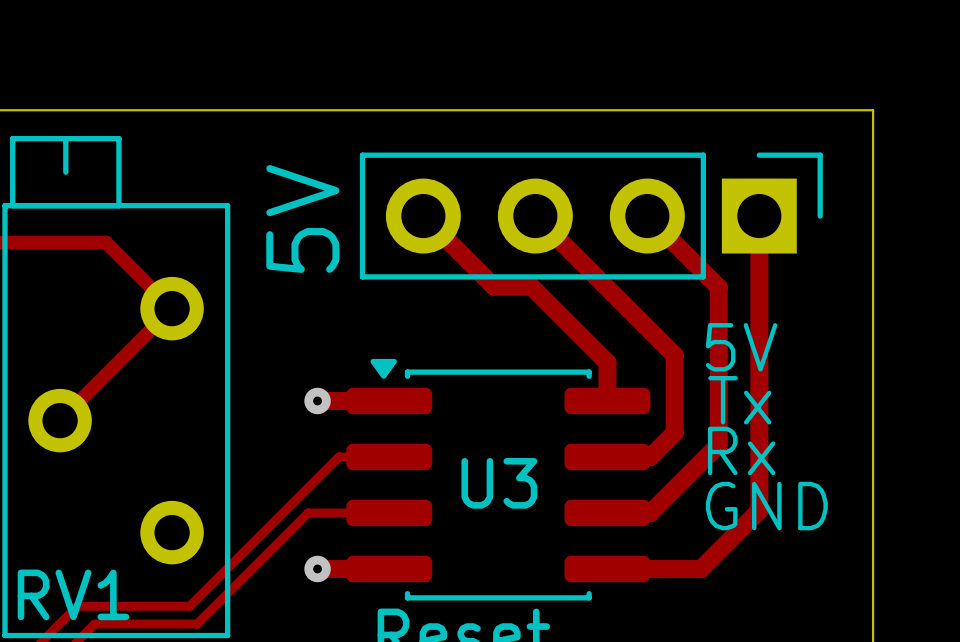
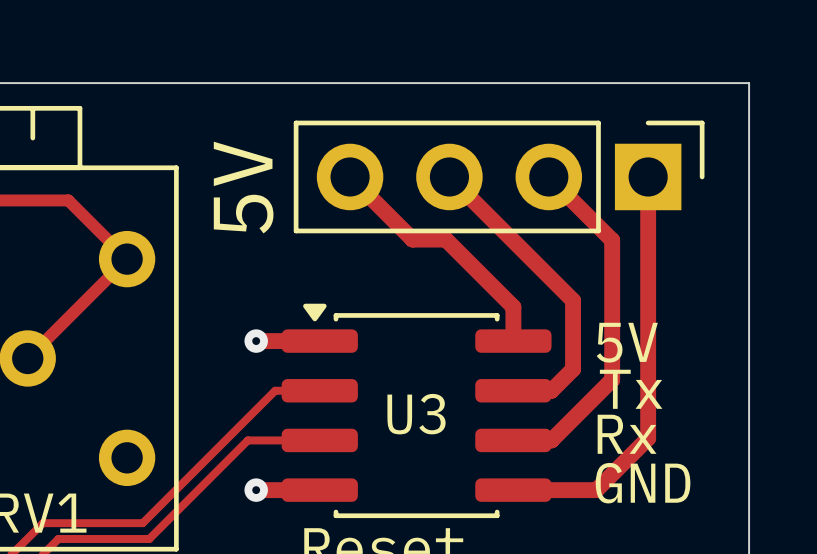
text position: 5V (741, 347) -> 5V (627, 342)
text position: Tx (739, 400) -> Tx (631, 389)
text: Rx (741, 450) -> none
text: GND (766, 506) -> Rx (627, 434)
text: none -> GND (643, 483)

